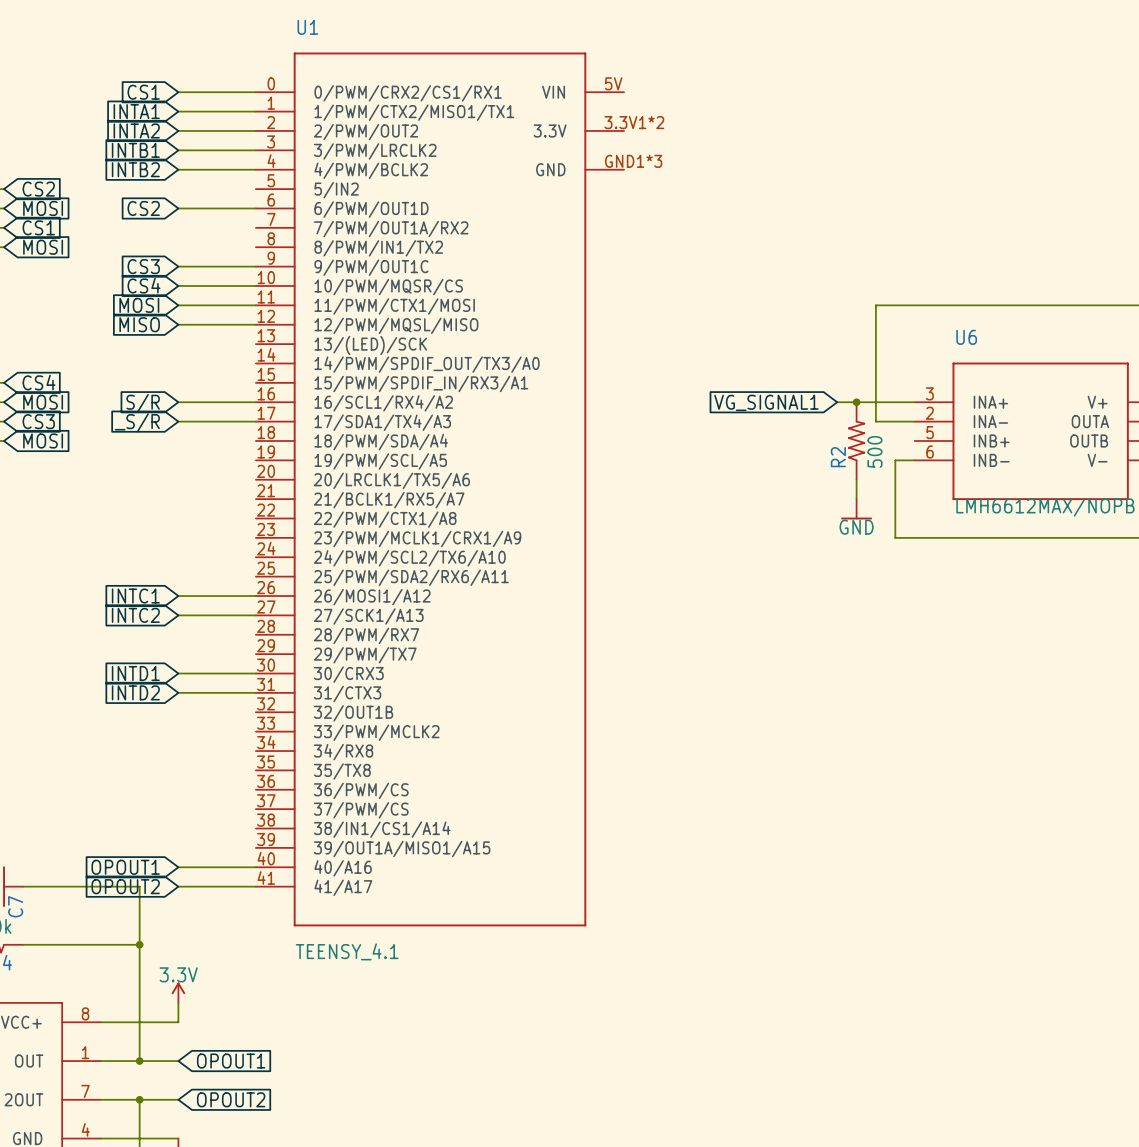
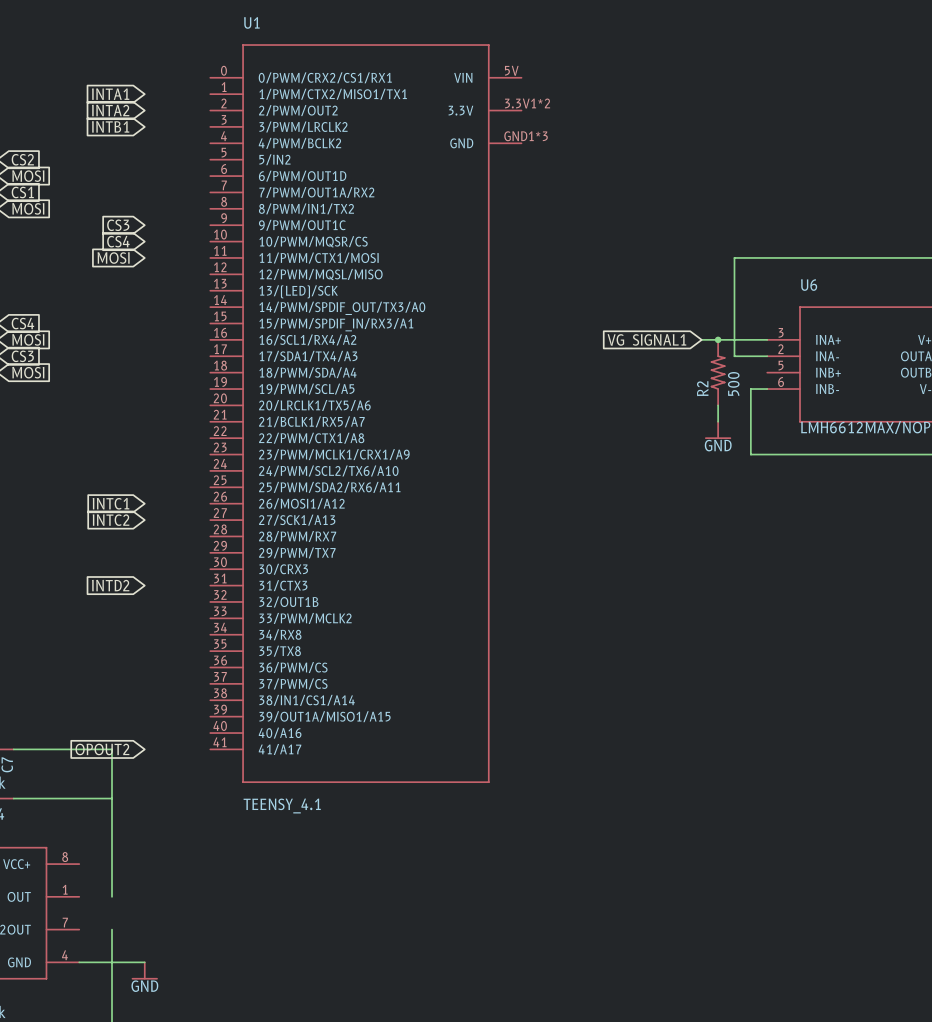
global label: CS1 (143, 92) -> none
wire: (178, 92) (255, 92) -> none
wire: (178, 111) (255, 111) -> none
wire: (178, 130) (255, 130) -> none
wire: (178, 150) (255, 150) -> none
global label: INTB2 (135, 169) -> none
wire: (178, 169) (255, 169) -> none
global label: CS2 (143, 208) -> none
wire: (178, 208) (255, 208) -> none
wire: (178, 266) (255, 266) -> none
wire: (178, 285) (255, 285) -> none
wire: (178, 305) (255, 305) -> none
global label: MISO (139, 324) -> none
wire: (178, 324) (255, 324) -> none
wire: (178, 402) (255, 402) -> none
global label: S/R (143, 403) -> none
wire: (178, 421) (255, 421) -> none
global label: _S/R (137, 422) -> none
wire: (178, 596) (255, 596) -> none
wire: (178, 615) (255, 615) -> none
global label: INTD1 (135, 673) -> none
wire: (178, 673) (255, 673) -> none
wire: (178, 692) (255, 692) -> none
global label: OPOUT1 (125, 867) -> none
wire: (178, 867) (255, 867) -> none
wire: (178, 886) (255, 886) -> none
junction: (139, 944) -> none
power symbol: 3.3V (178, 992) -> none
wire: (178, 1002) (178, 1022) (100, 1022) -> none
wire: (100, 1061) (178, 1061) -> none
junction: (139, 1061) -> none
global label: OPOUT1 (231, 1061) -> none
wire: (100, 1099) (178, 1099) -> none
junction: (139, 1099) -> none
global label: OPOUT2 (231, 1099) -> none

